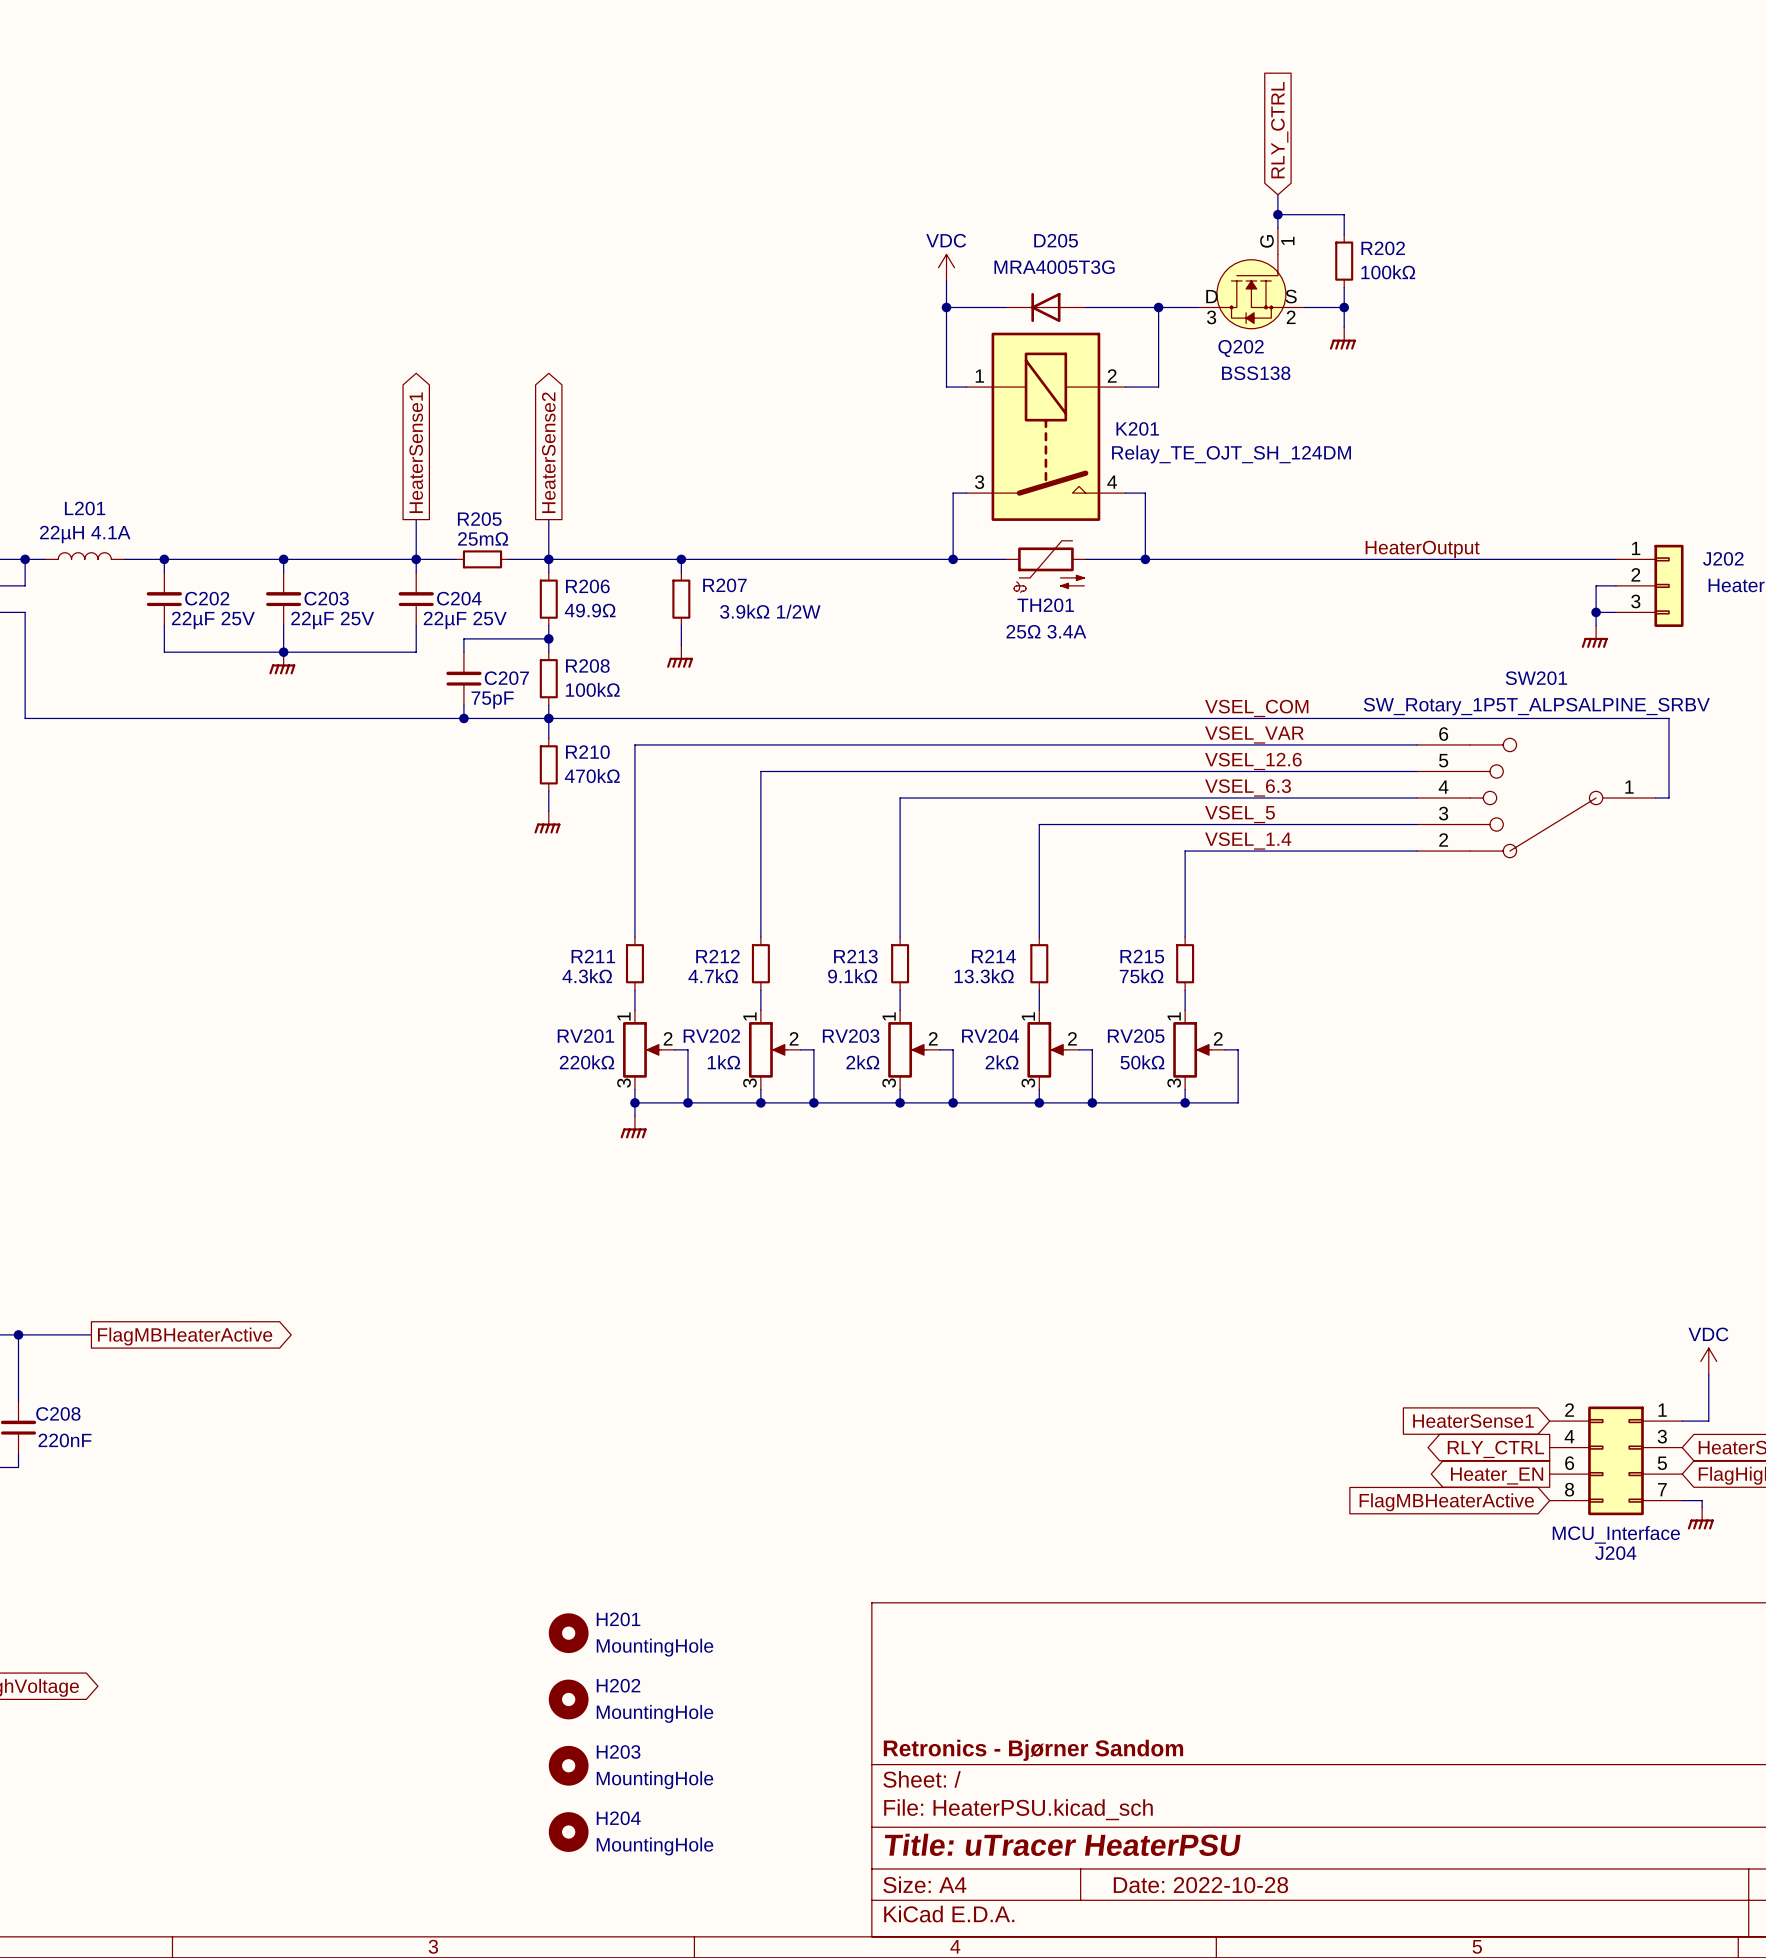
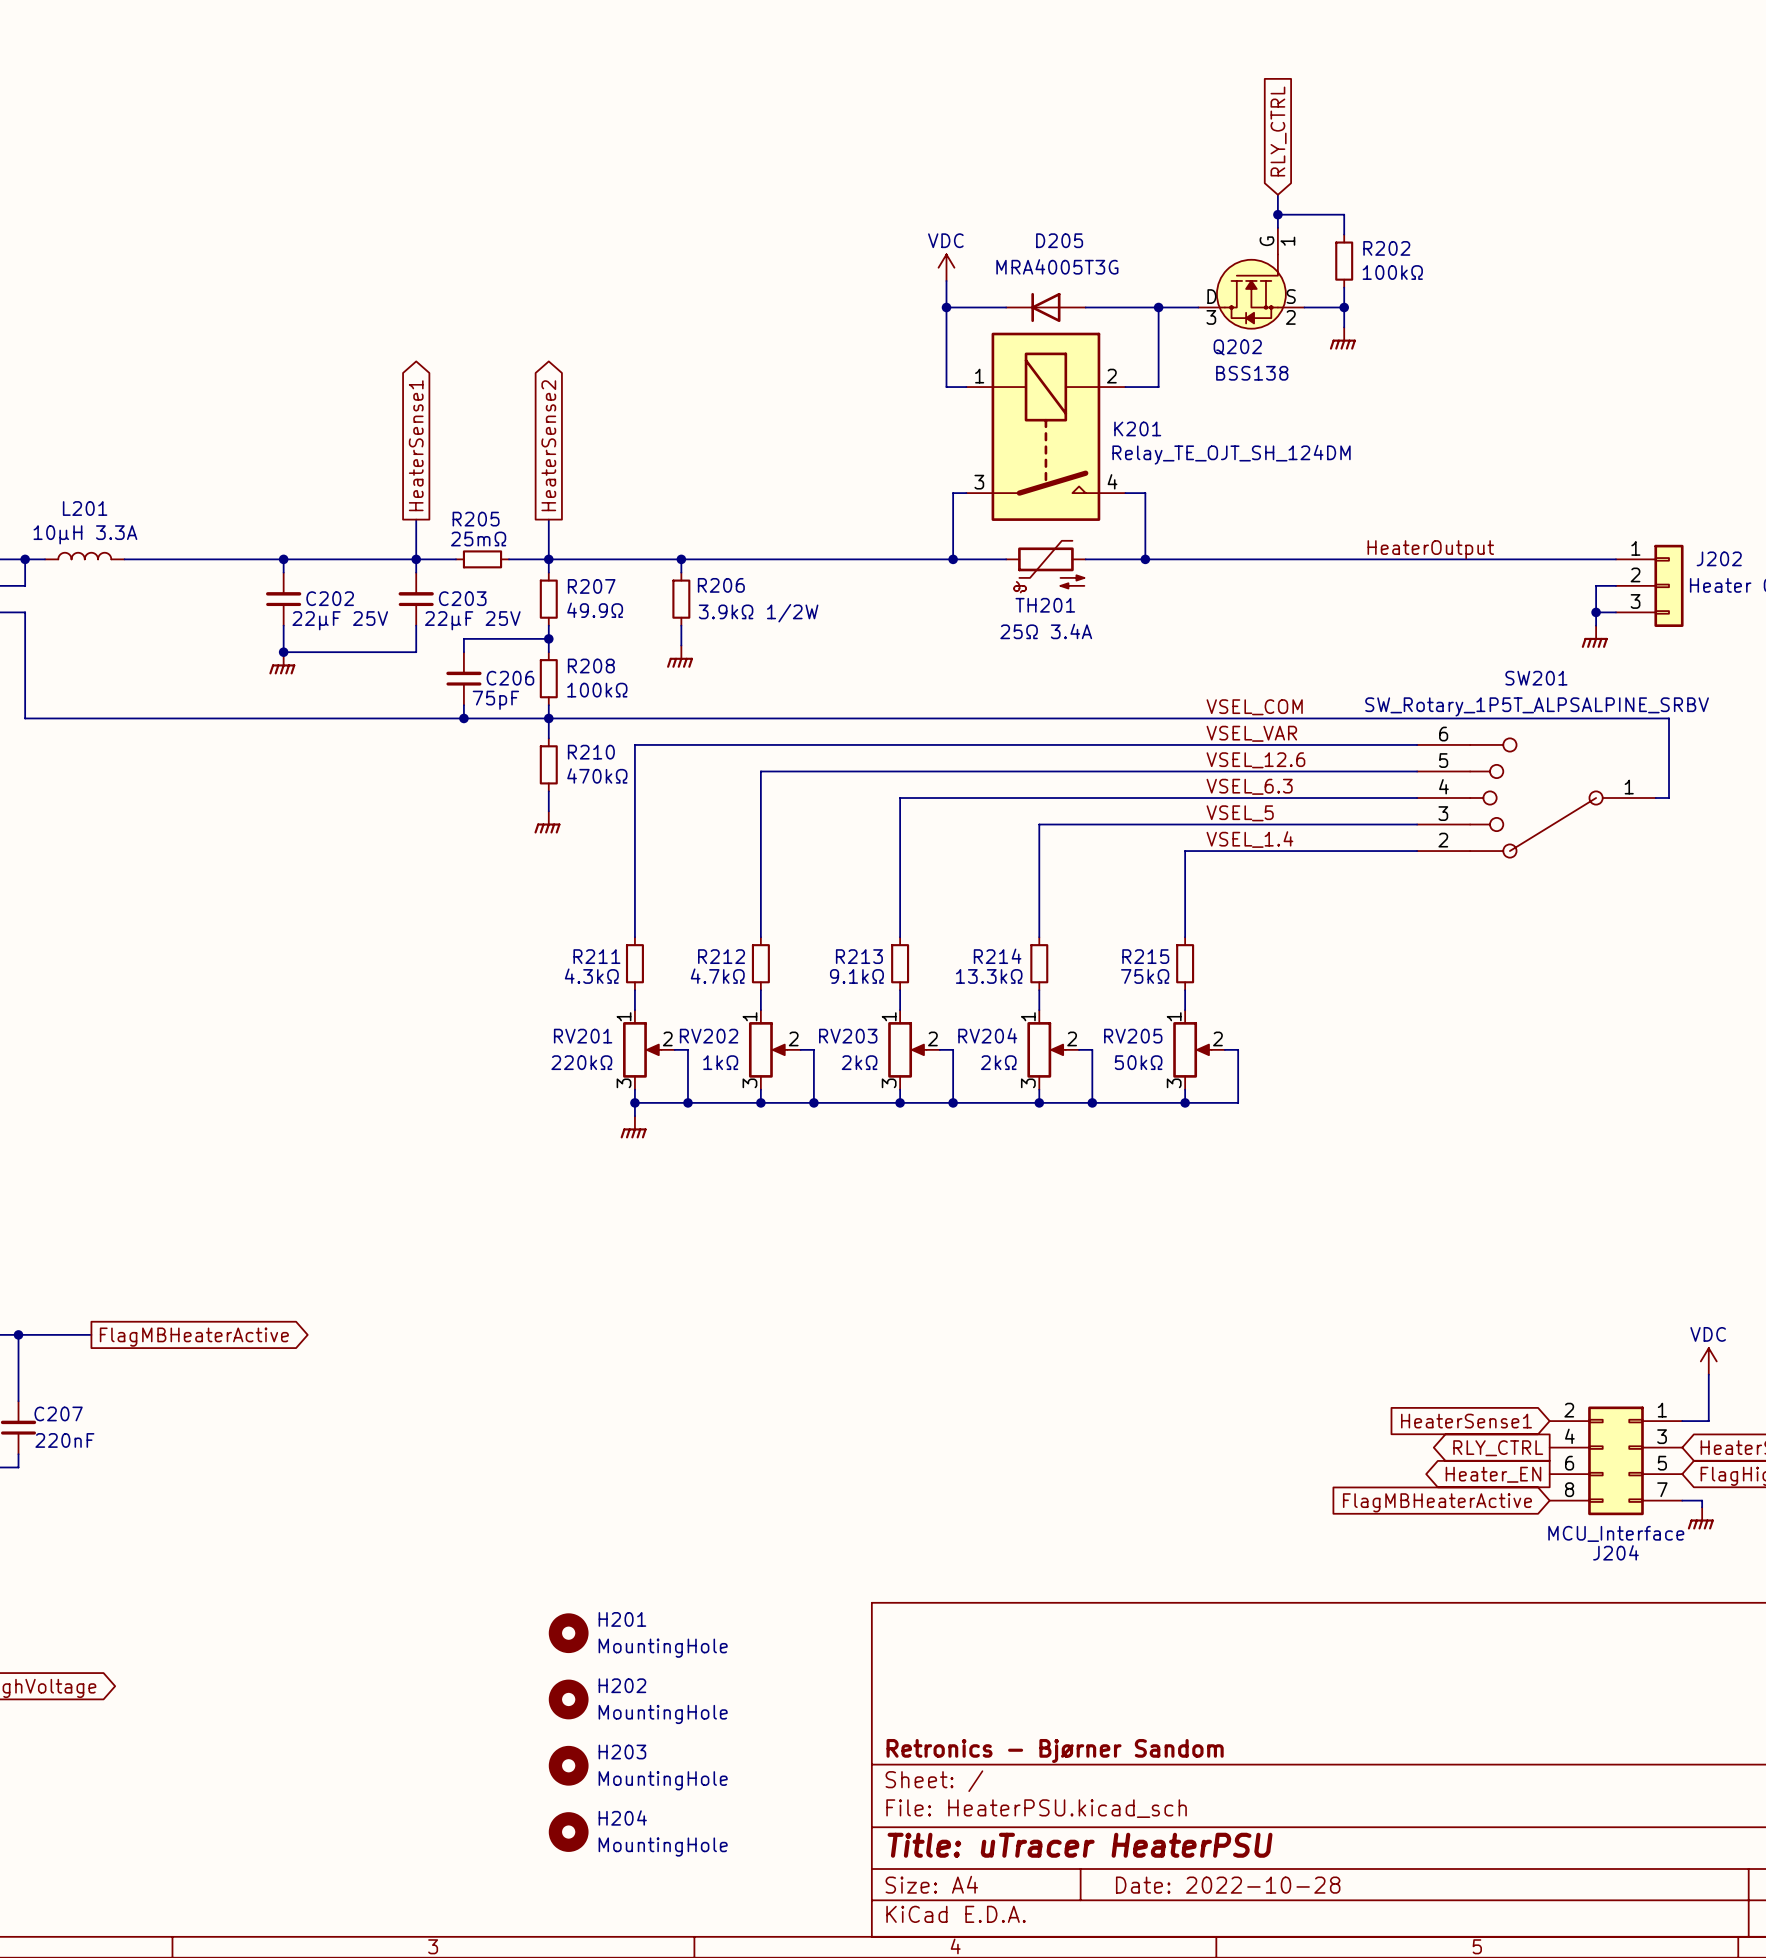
L201 value: 22µH 4.1A (85, 534) -> 10µH 3.3A (85, 534)
wire: (164, 559) (164, 572) -> none
junction: (164, 559) -> none
R207 name: R207 (724, 585) -> R206 (721, 585)
R206 name: R206 (587, 586) -> R207 (591, 586)
C203 name: C203 (326, 598) -> C202 (330, 598)
C204 name: C204 (459, 598) -> C203 (462, 598)
C202: 22µF 25V (164, 599) -> none
wire: (164, 625) (164, 652) (283, 652) -> none
C207 name: C207 (506, 678) -> C206 (510, 678)
C208 name: C208 (58, 1413) -> C207 (58, 1413)

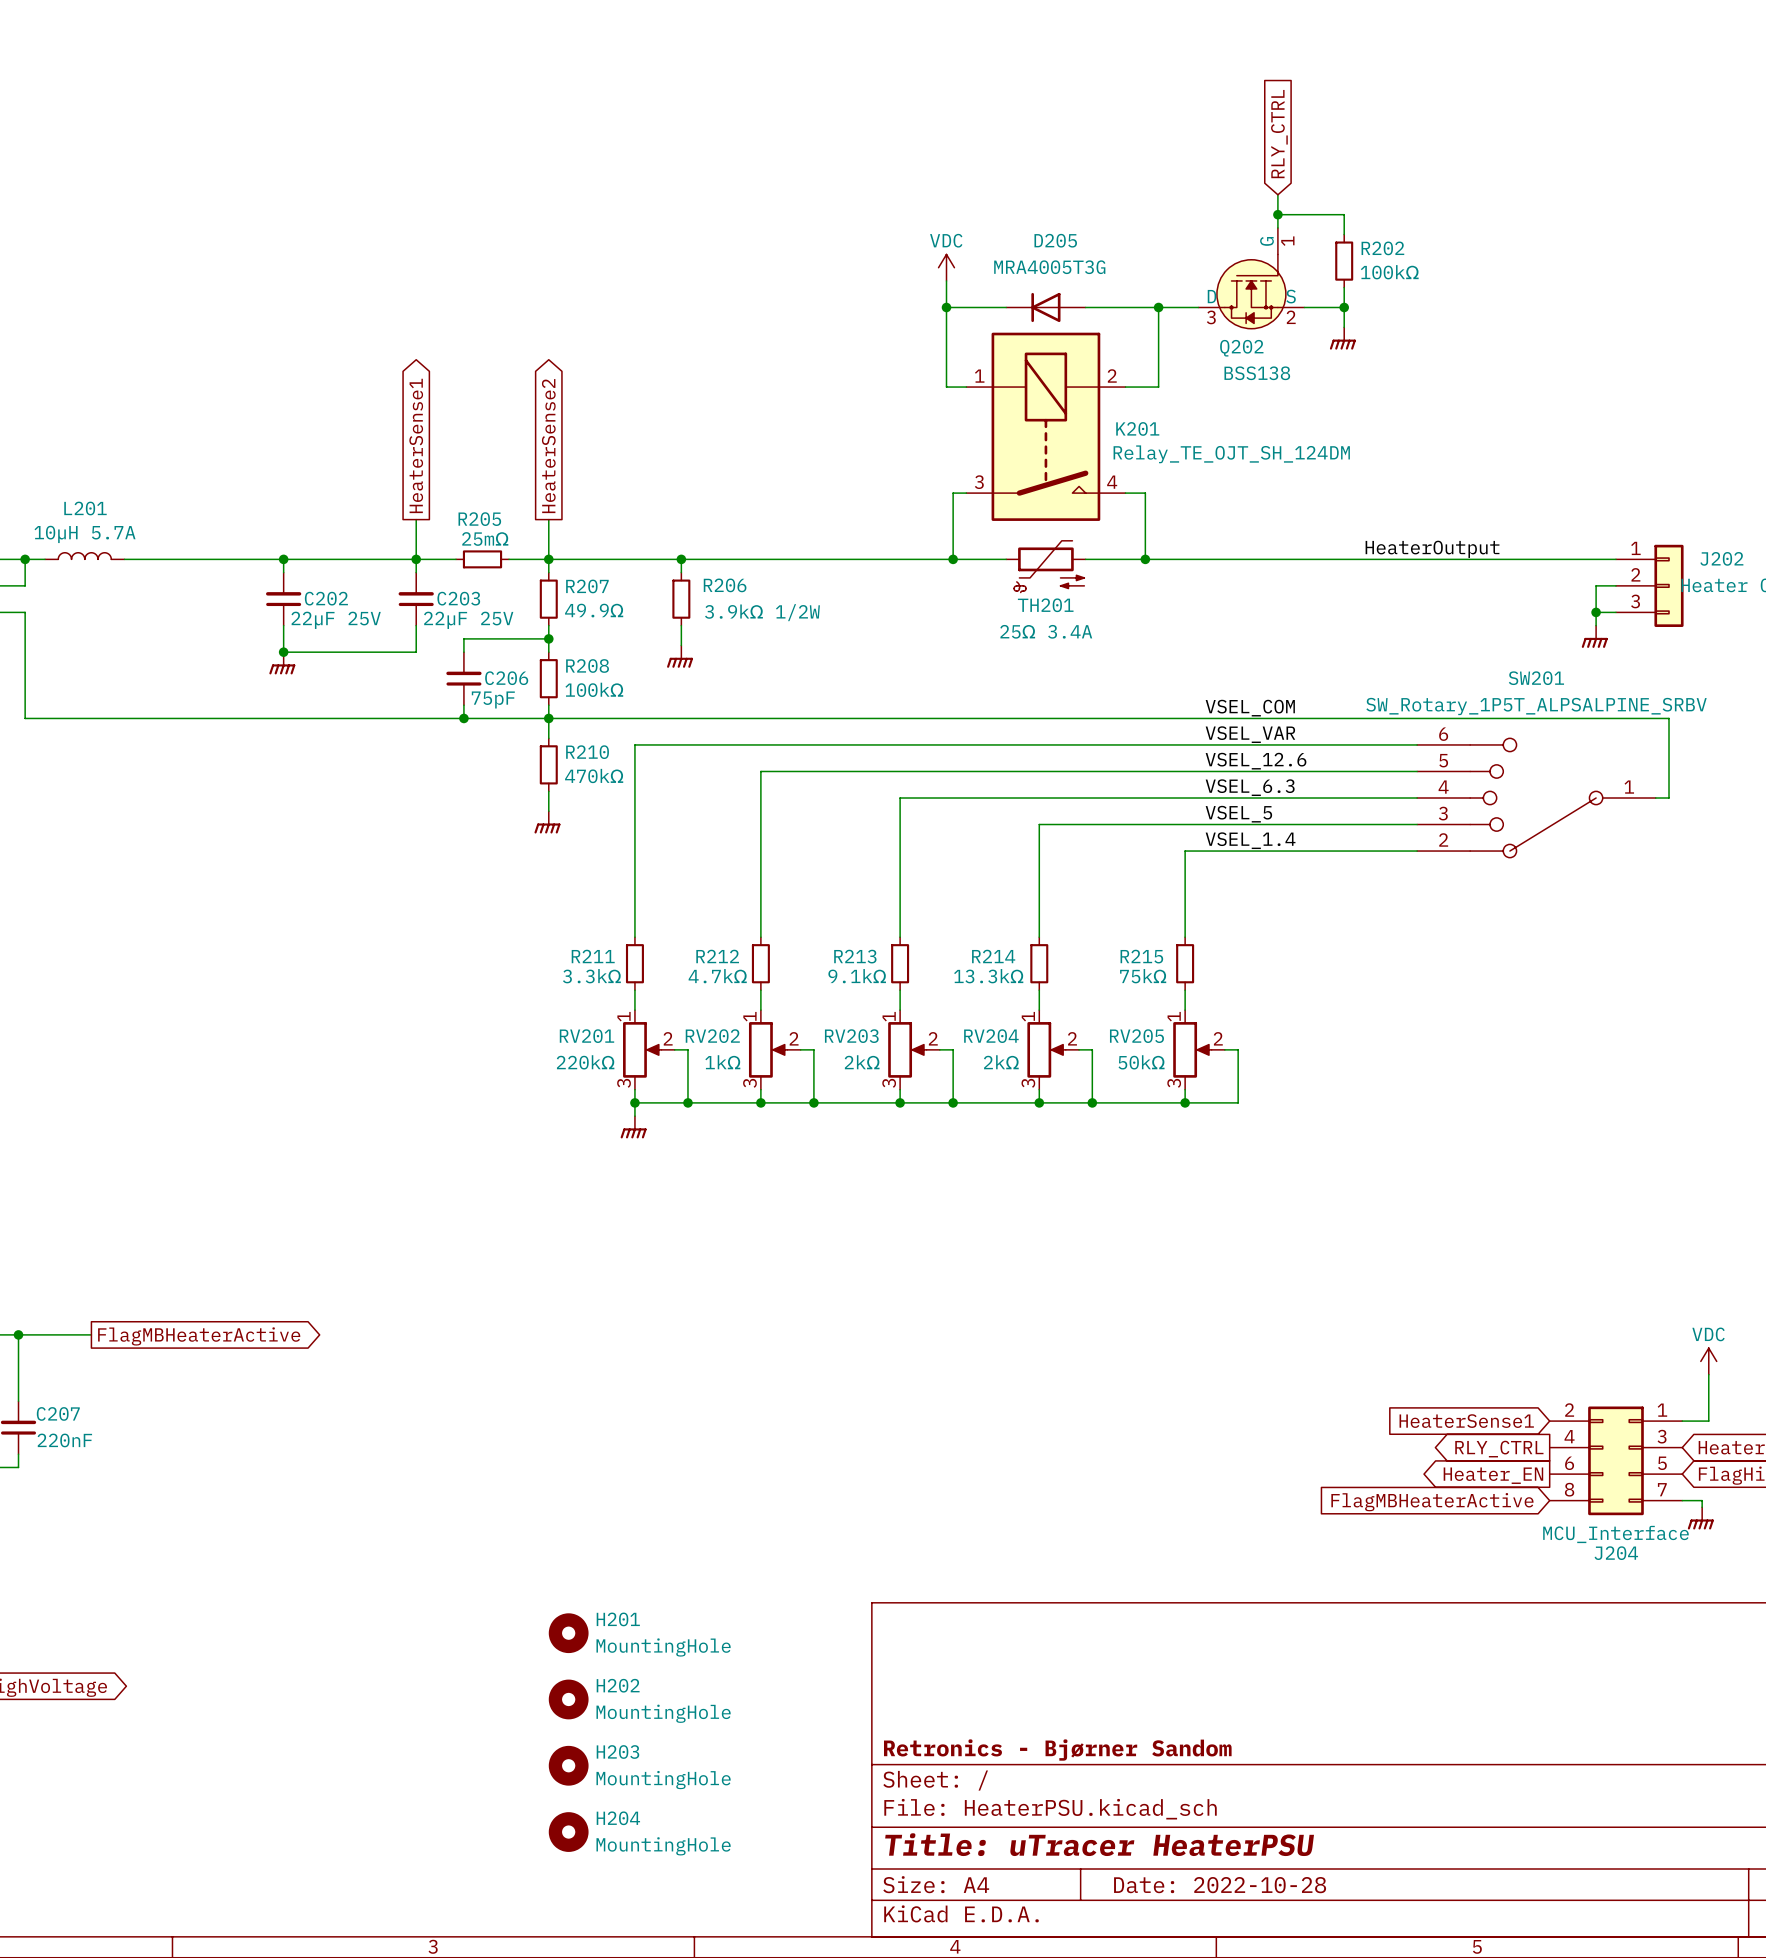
L201 value: 10µH 3.3A (85, 534) -> 10µH 5.7A (85, 534)
R211 value: 4.3kΩ (591, 976) -> 3.3kΩ (591, 976)

